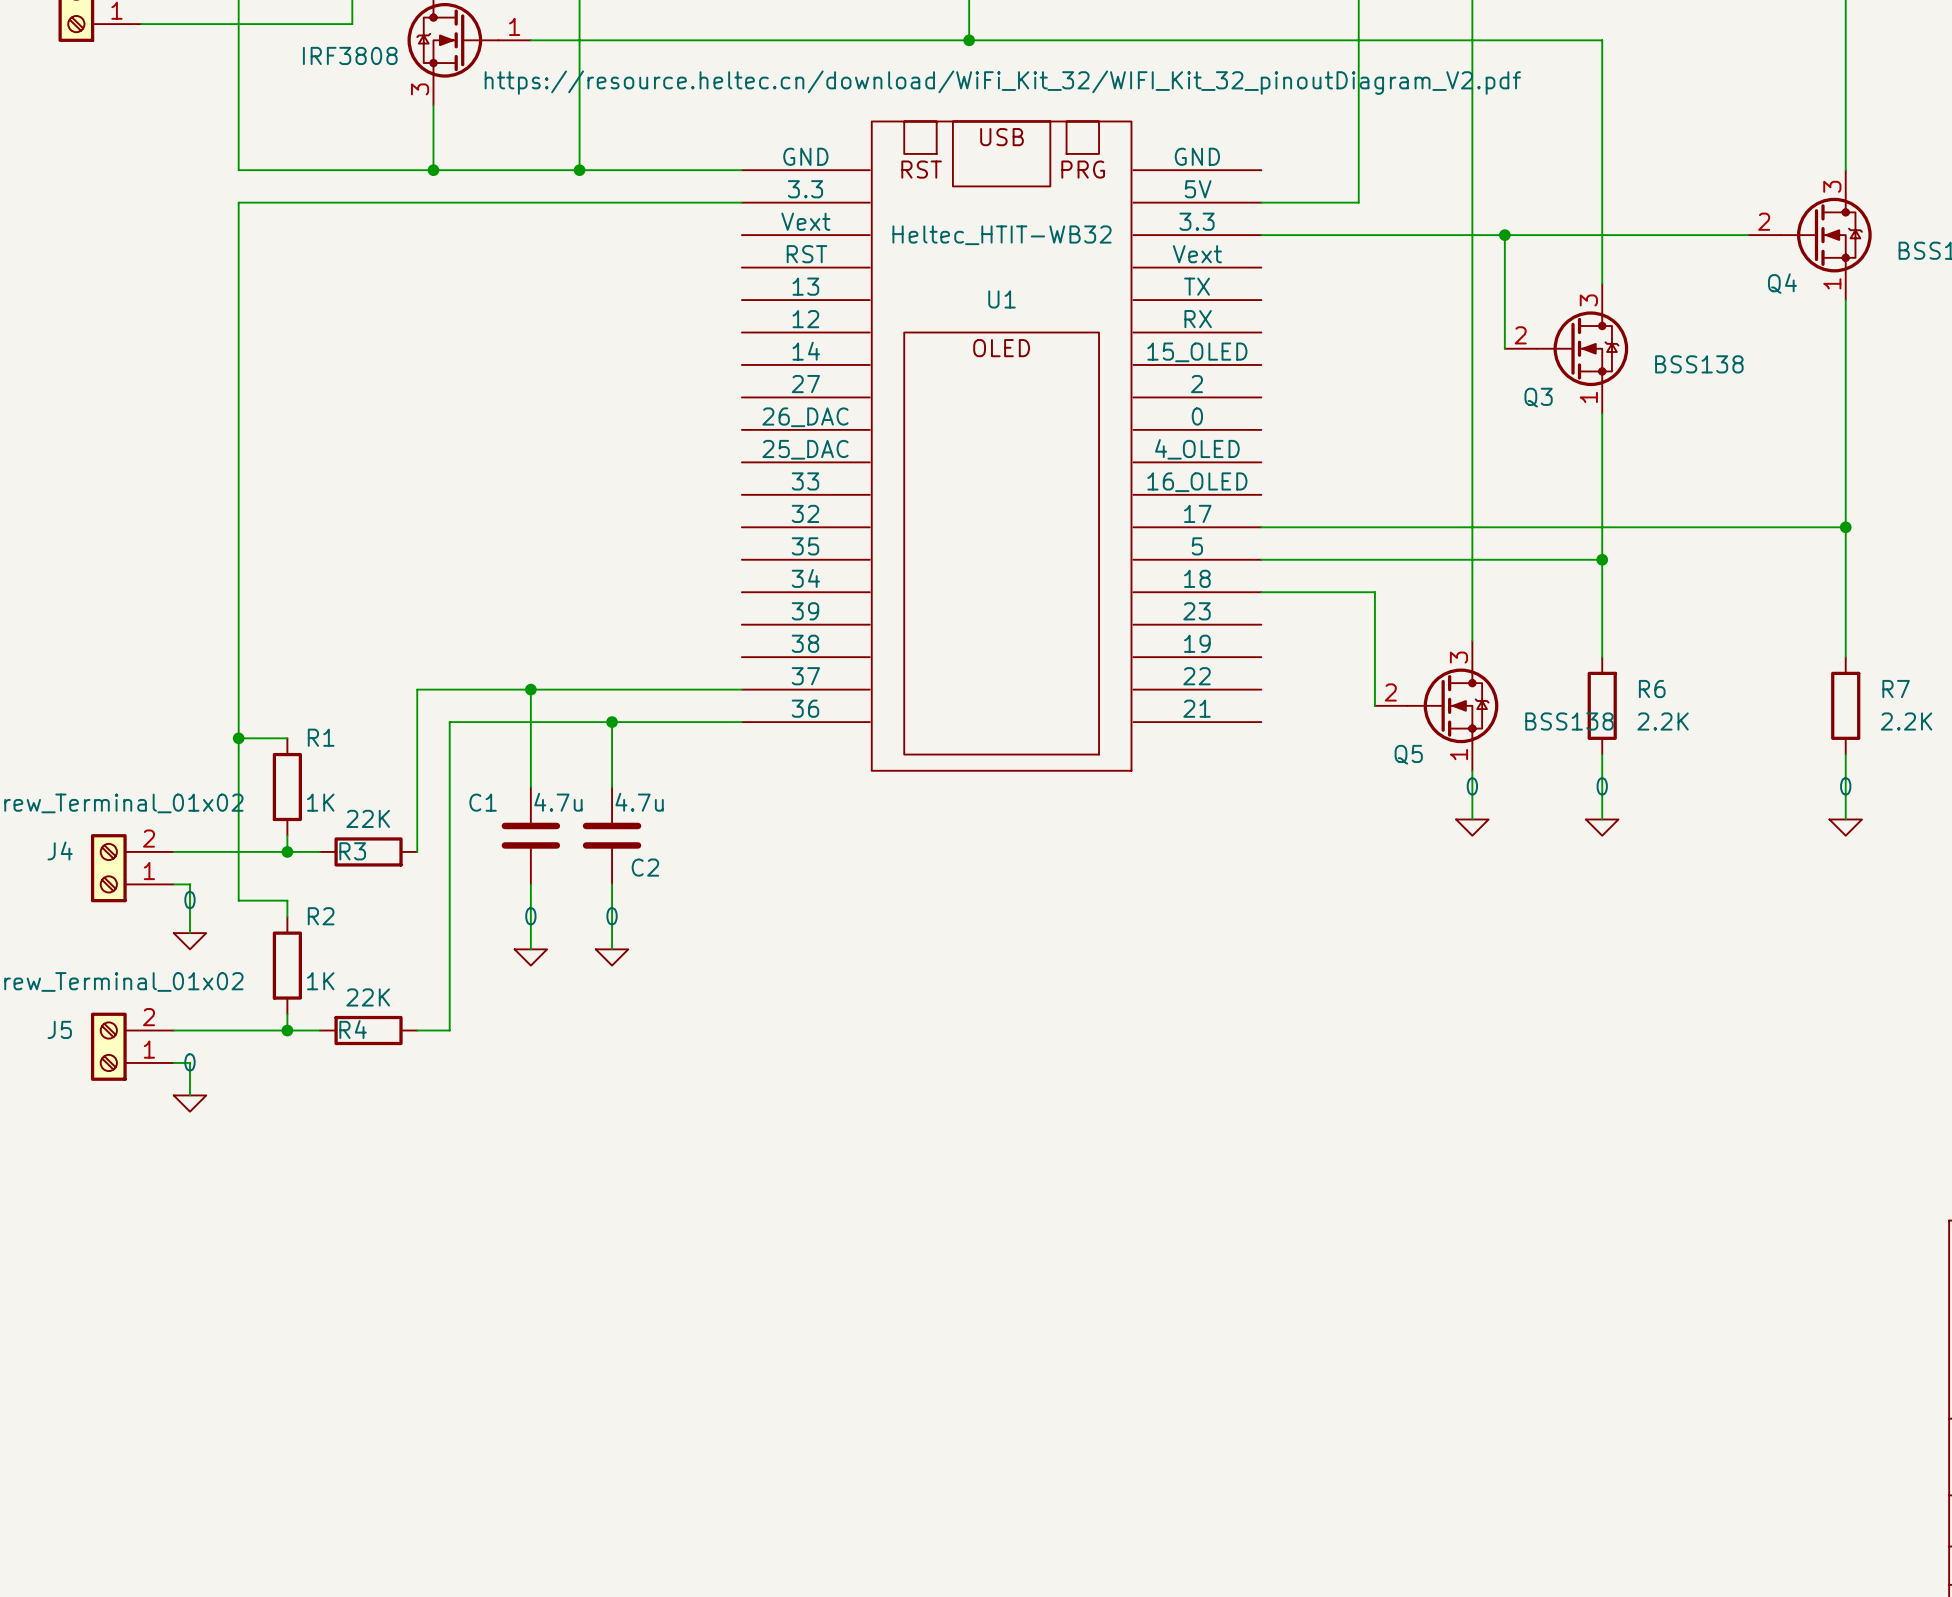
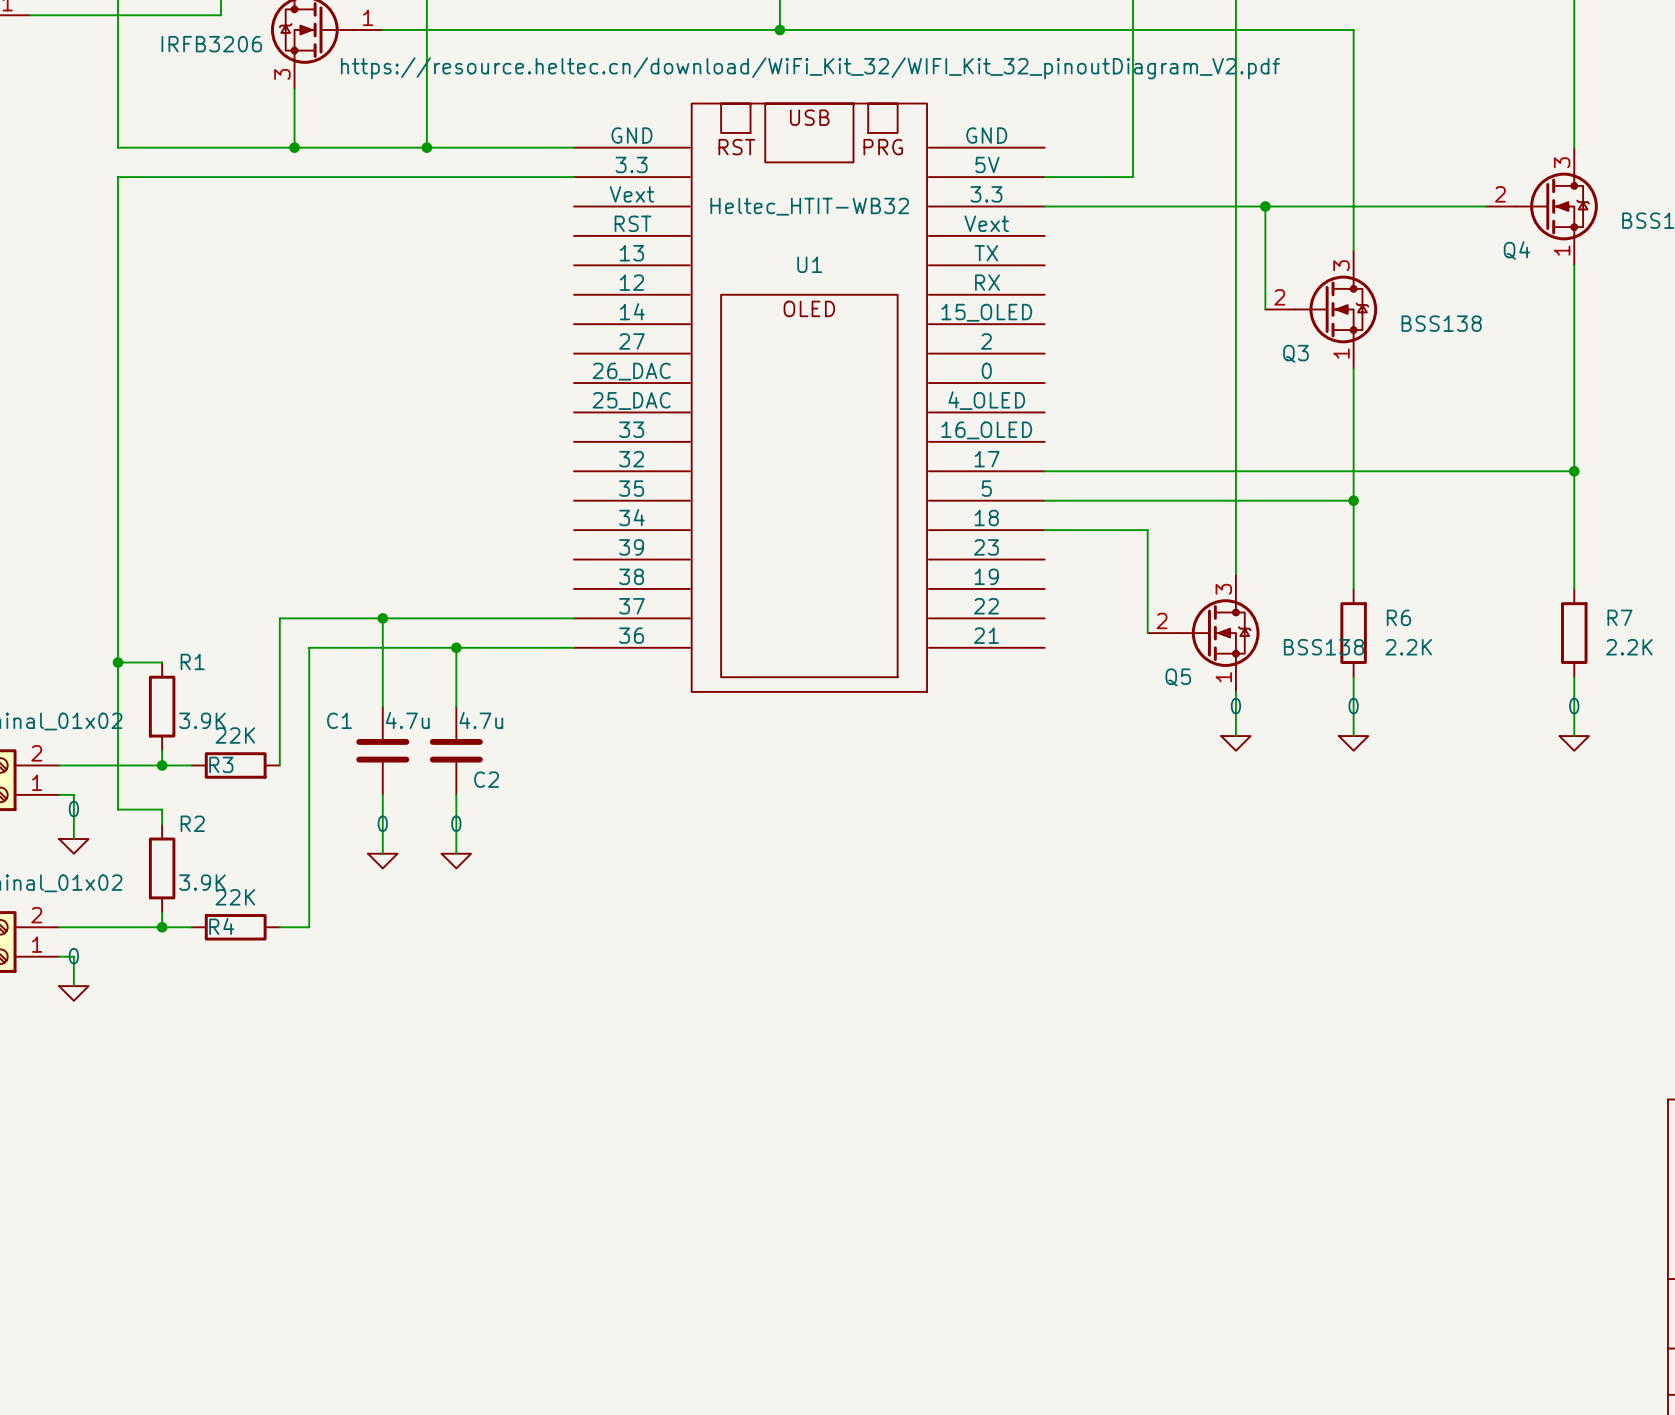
part value: IRF3808 (350, 55) -> IRFB3206 (211, 44)
R1 value: 1K (320, 802) -> 3.9K (202, 720)
R2 value: 1K (320, 981) -> 3.9K (202, 882)

